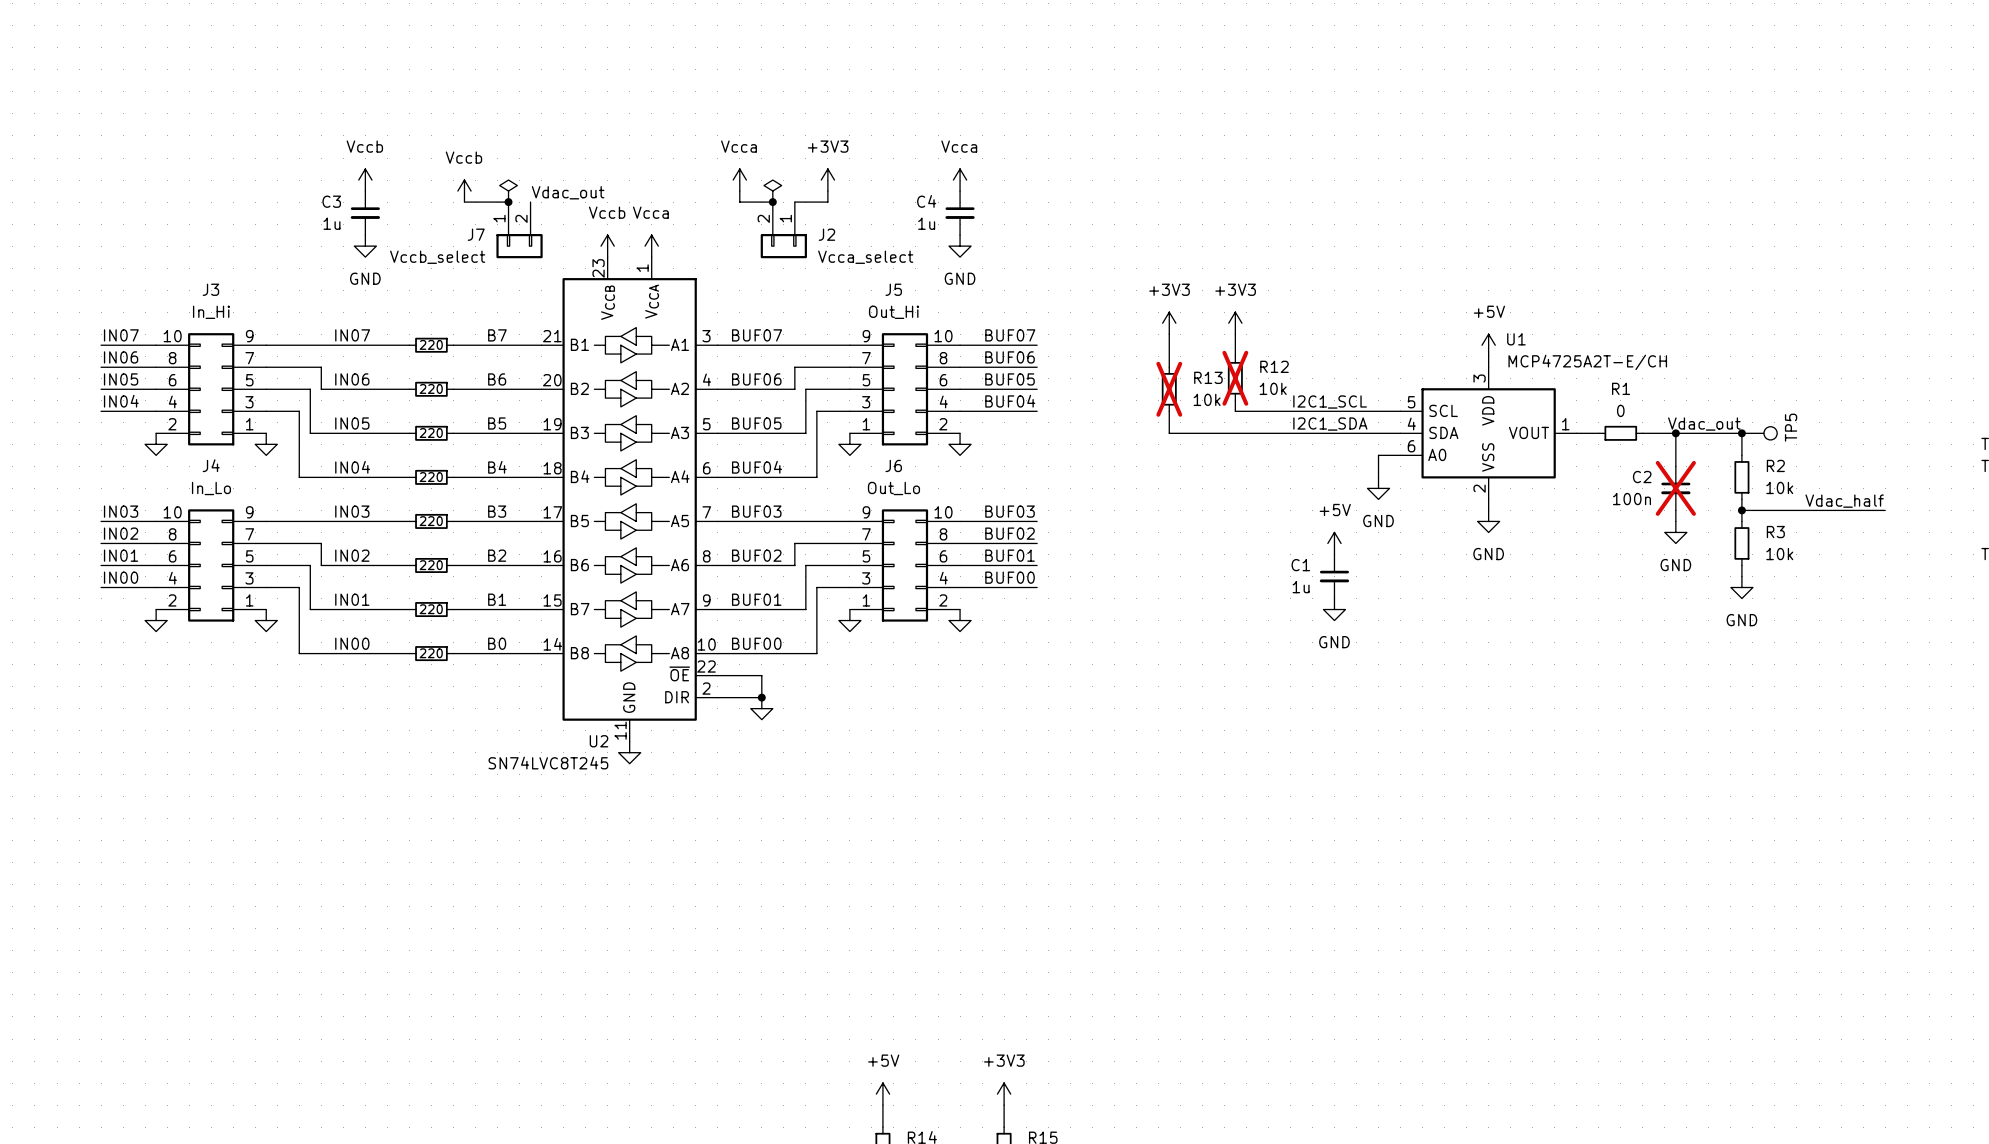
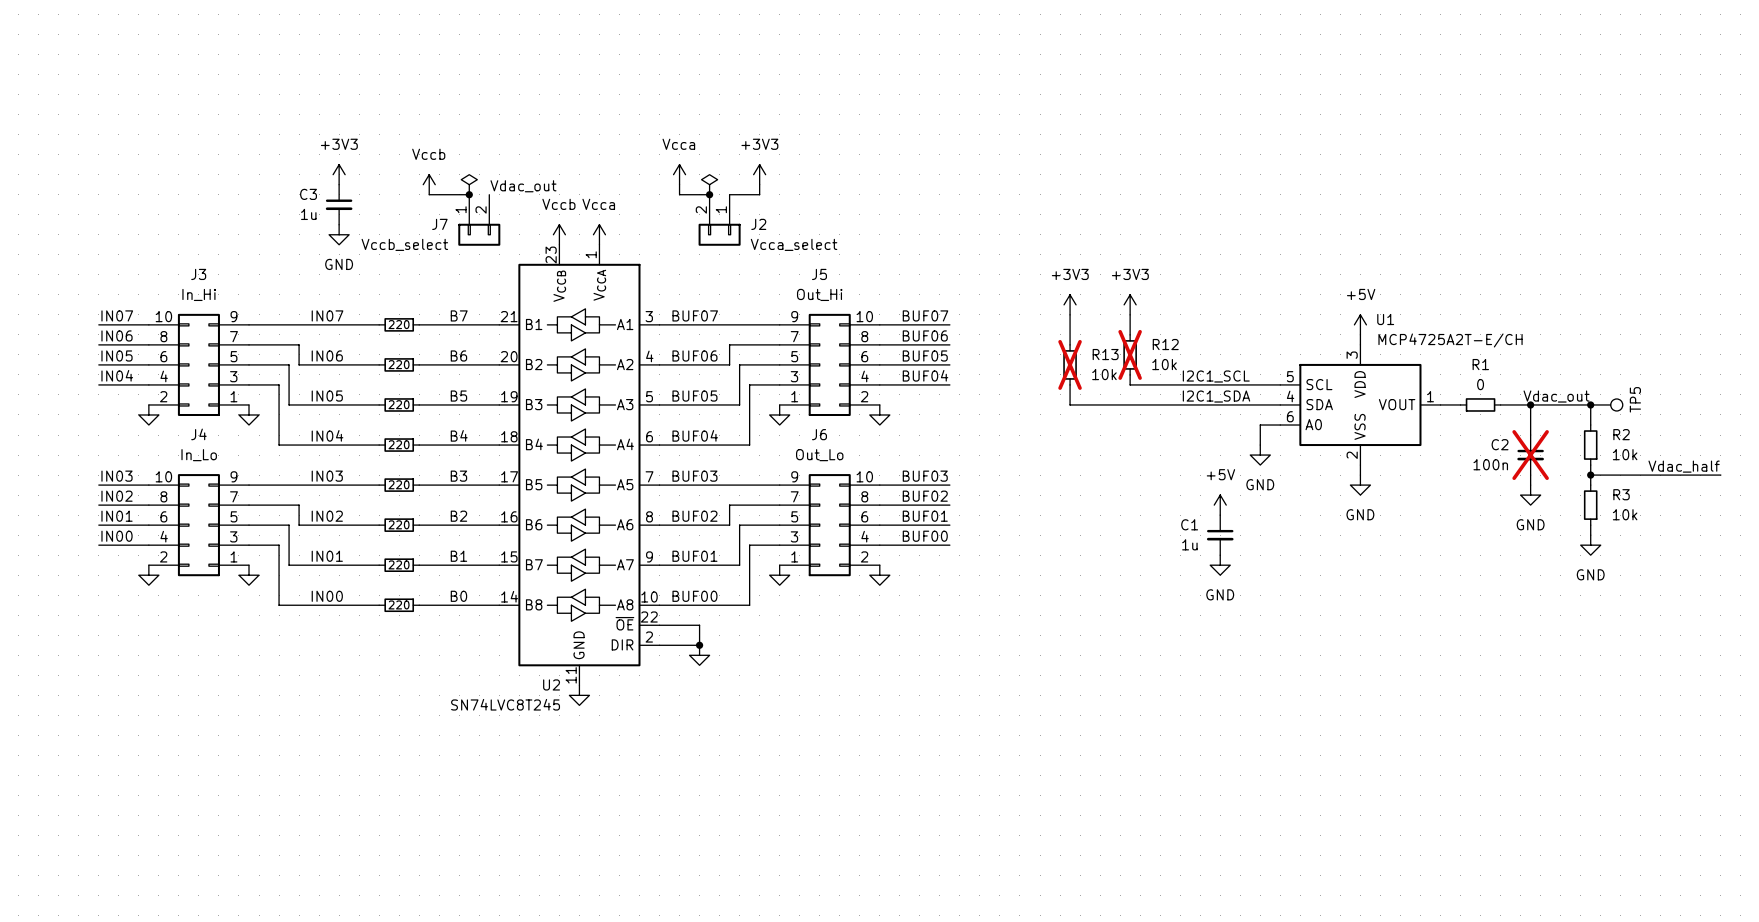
power symbol: Vccb (365, 180) -> +3V3 (339, 174)
power symbol: Vcca (960, 180) -> none
C4: 1u (960, 213) -> none
power symbol: GND (960, 246) -> none

